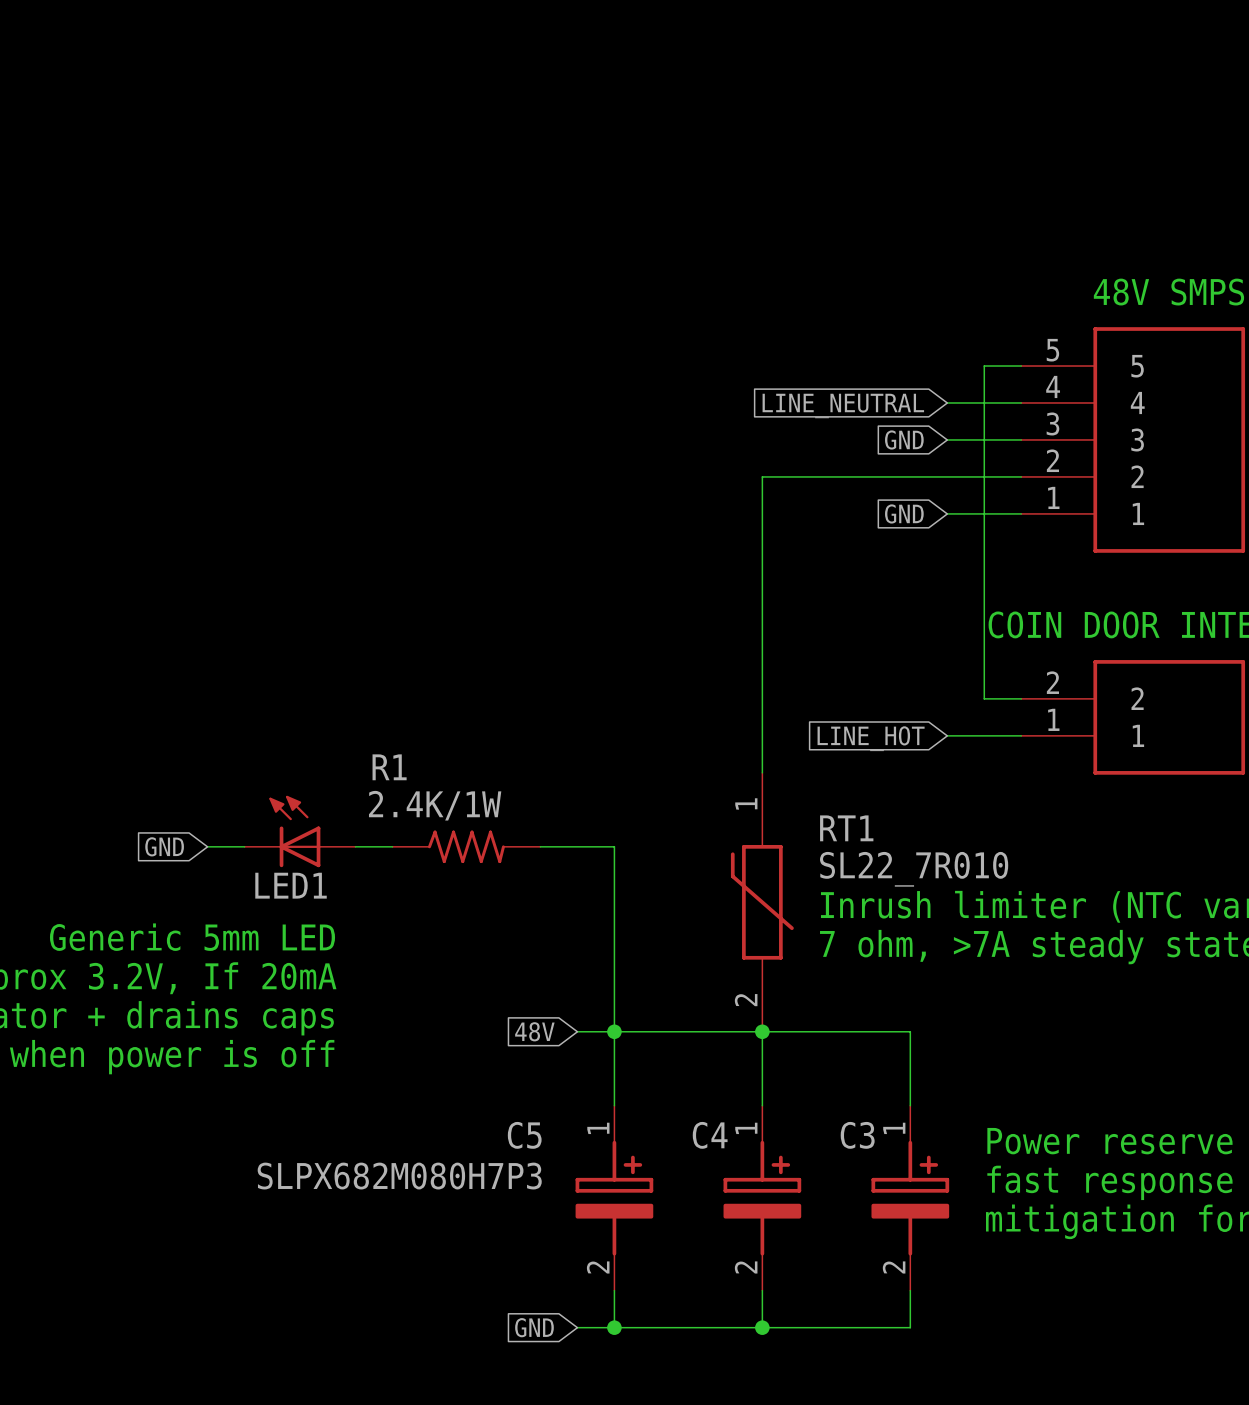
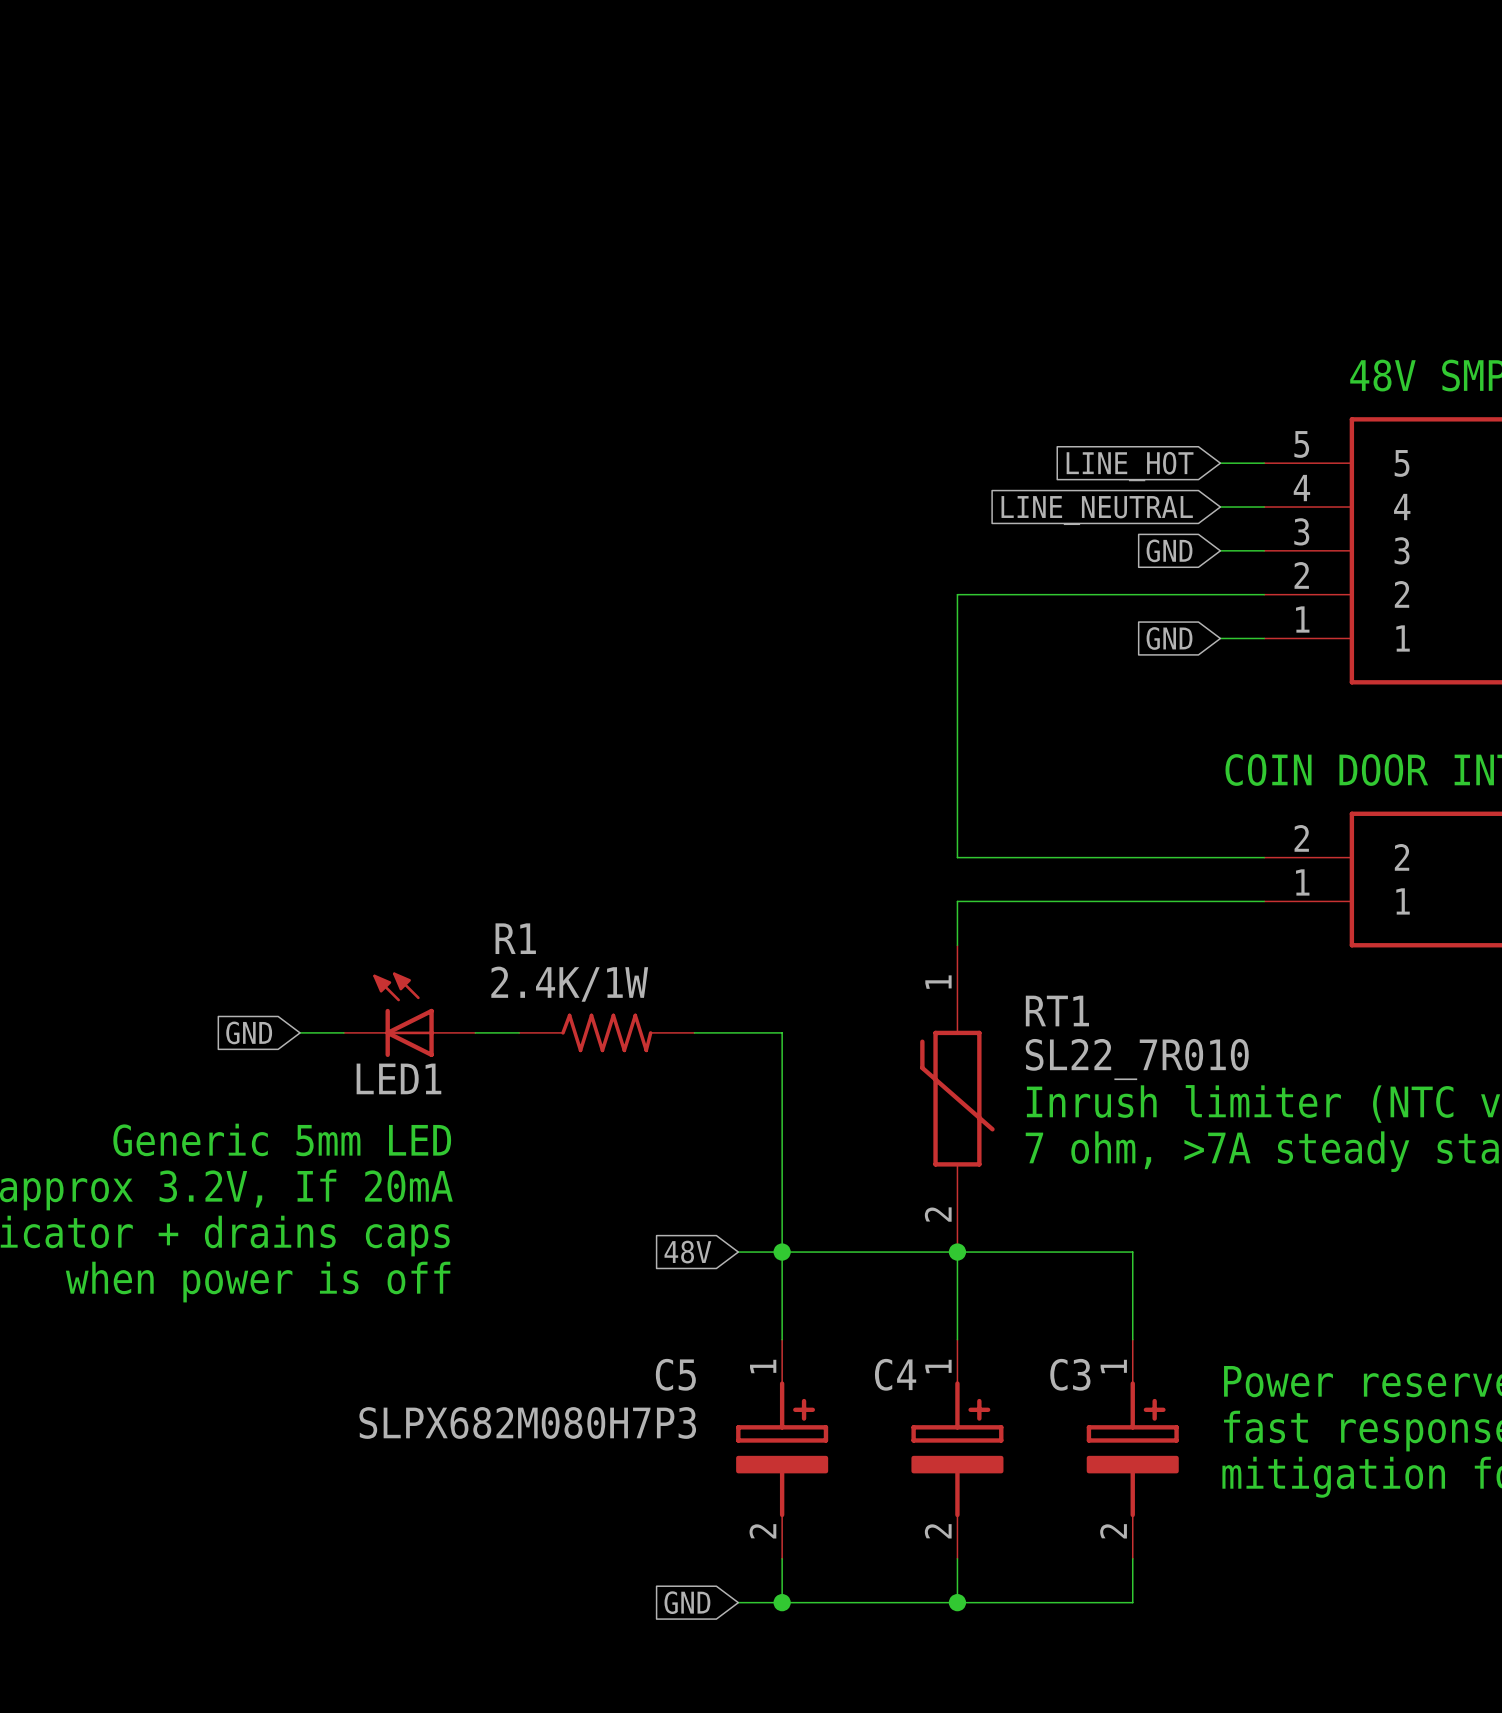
wire: (984, 366) (984, 698) -> (957, 857) (1220, 857)
global label: none -> LINE_HOT (1130, 466)
wire: (947, 402) (984, 402) -> none
global label position: LINE_NEUTRAL (843, 405) -> LINE_NEUTRAL (1097, 510)
global label position: GND (904, 439) -> GND (1169, 550)
wire: (947, 439) (984, 439) -> none
global label position: GND (904, 513) -> GND (1169, 638)
wire: (947, 513) (984, 513) -> none
wire: (762, 698) (762, 735) -> (1176, 901) (957, 901)
global label: LINE_HOT (871, 738) -> none

